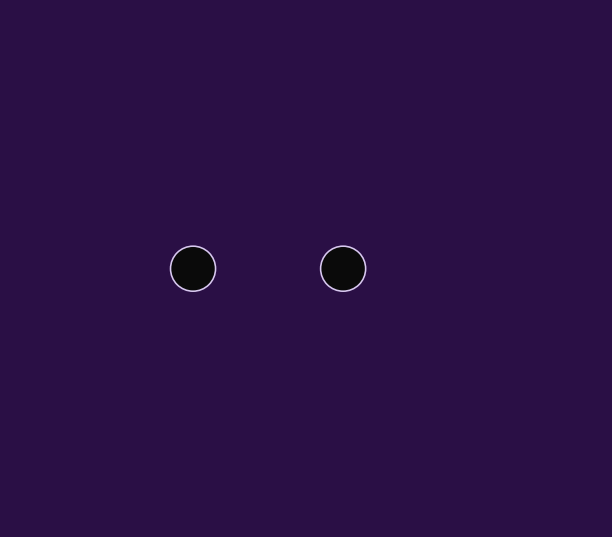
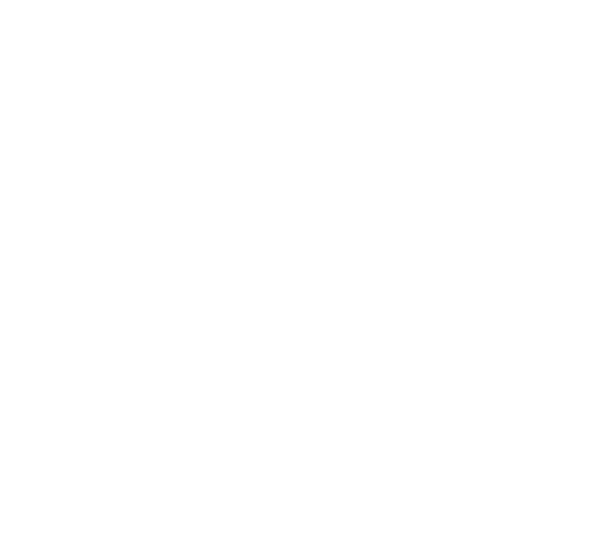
part: (268, 268) -> none

